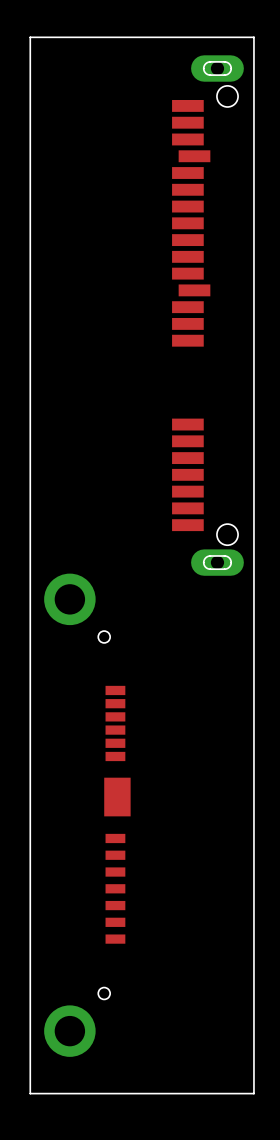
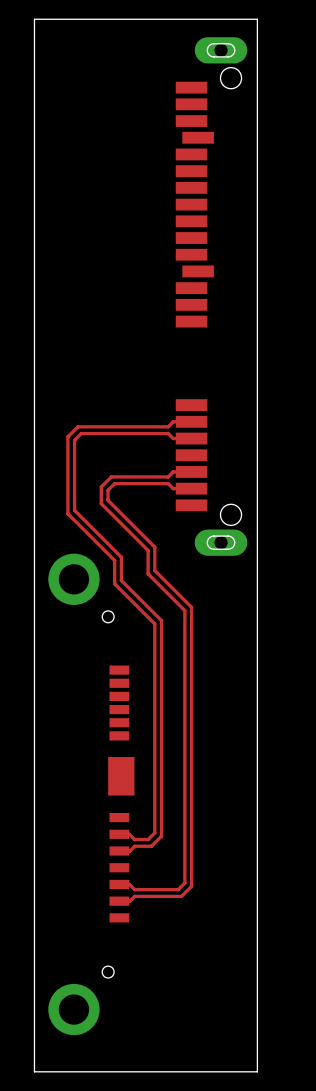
track: none -> (191, 421) (173, 421) (168, 426) (77, 426) (67, 436) (67, 513) (114, 560) (114, 583) (154, 624) (154, 832) (148, 839) (134, 839) (129, 834) (119, 834)
track: none -> (191, 438) (173, 438) (168, 433) (81, 433) (74, 440) (74, 510) (121, 557) (121, 580) (161, 620) (161, 836) (151, 846) (134, 846) (129, 851) (119, 851)
track: none -> (191, 471) (173, 471) (168, 476) (111, 476) (101, 486) (101, 503) (148, 550) (148, 573) (184, 610) (184, 883) (178, 889) (134, 889) (129, 884) (119, 884)
track: none -> (191, 488) (173, 488) (168, 483) (114, 483) (108, 490) (108, 500) (154, 547) (154, 570) (191, 607) (191, 886) (181, 896) (134, 896) (129, 901) (119, 901)

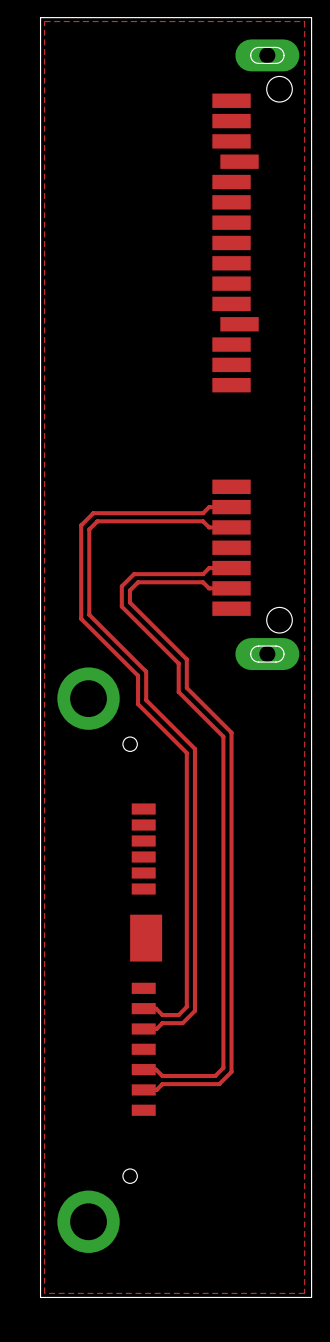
zone outline: none -> (44, 21) (304, 21) (304, 1293) (44, 1293) (44, 21)

